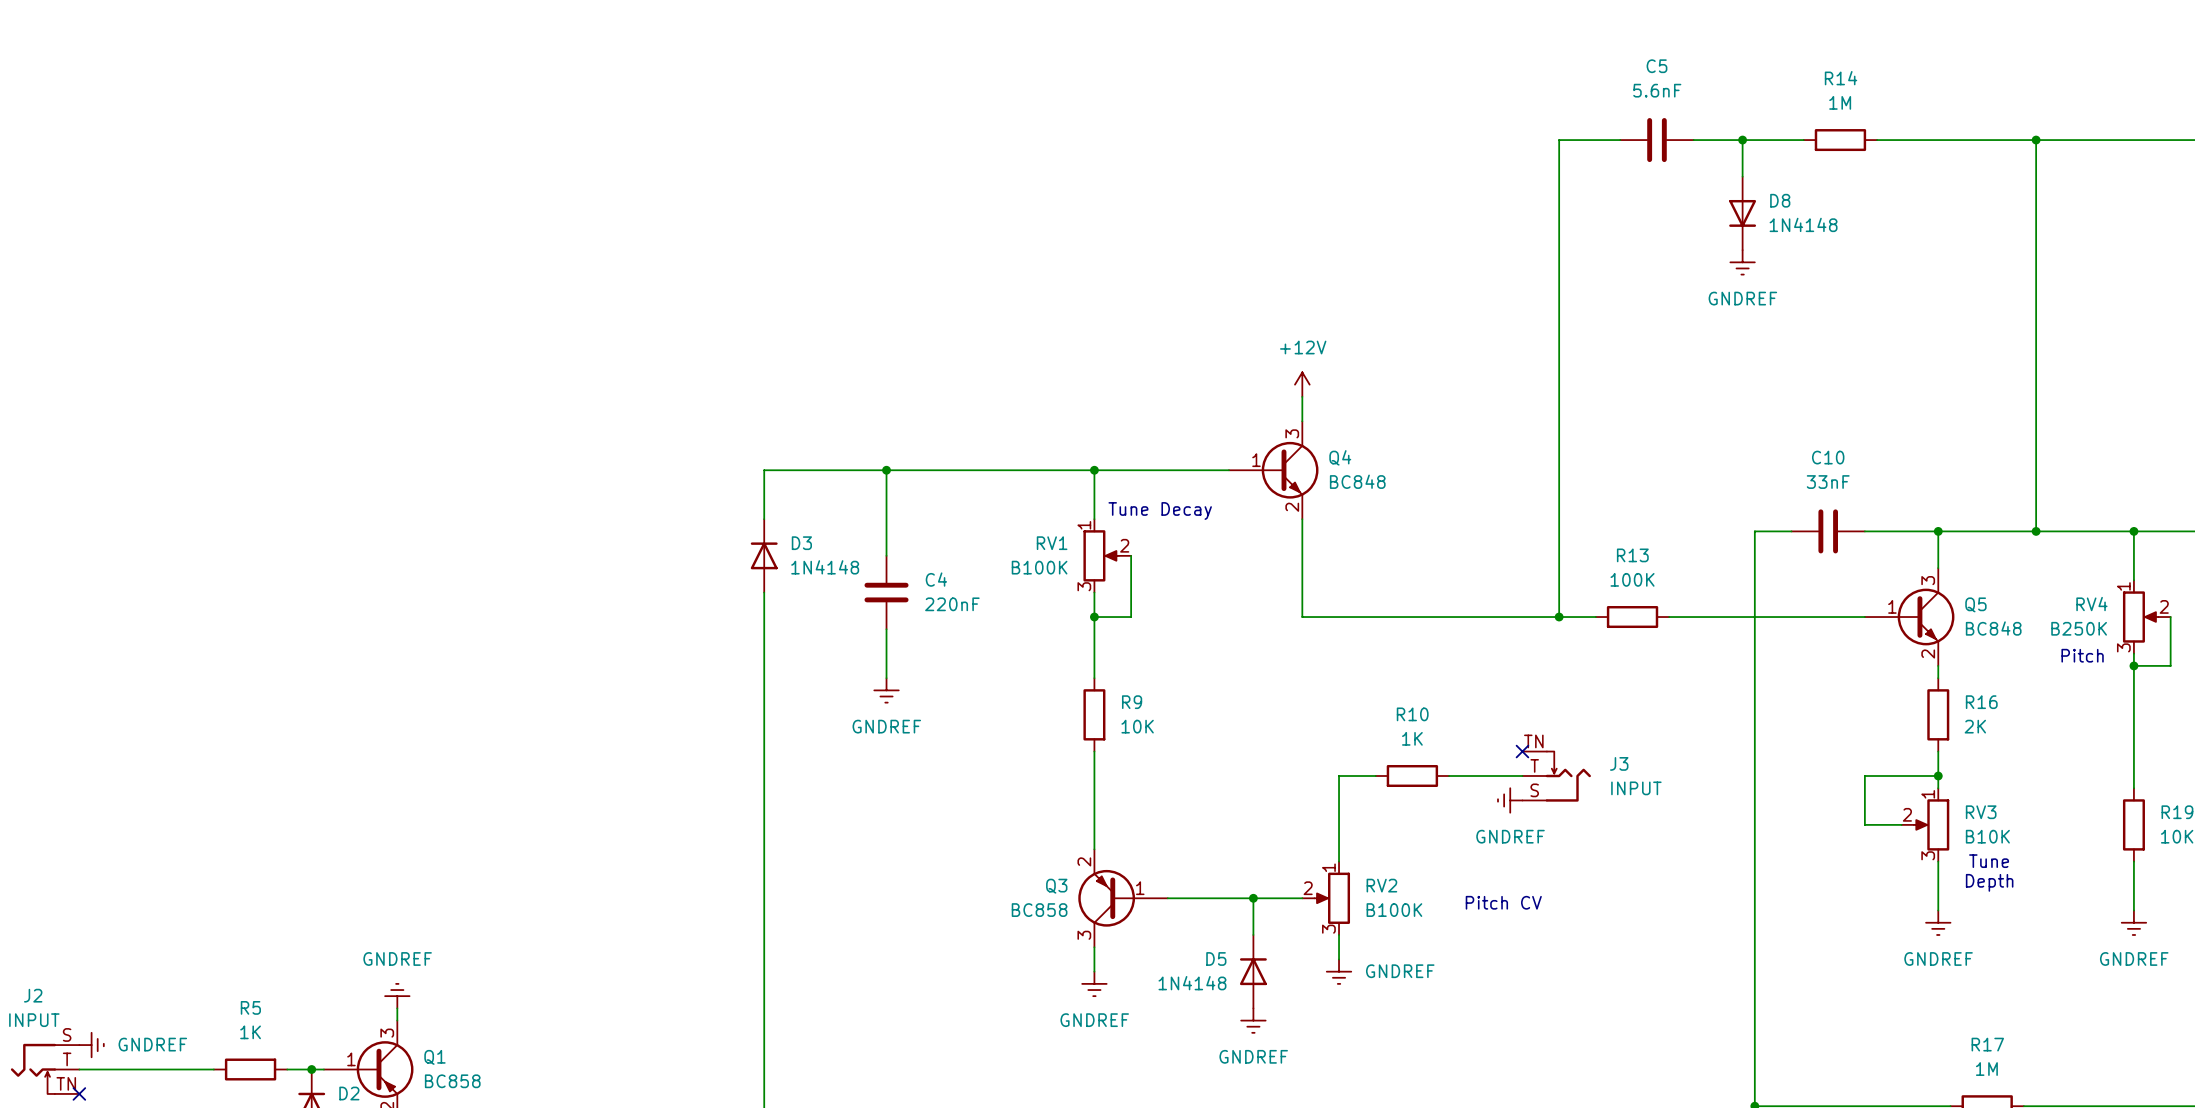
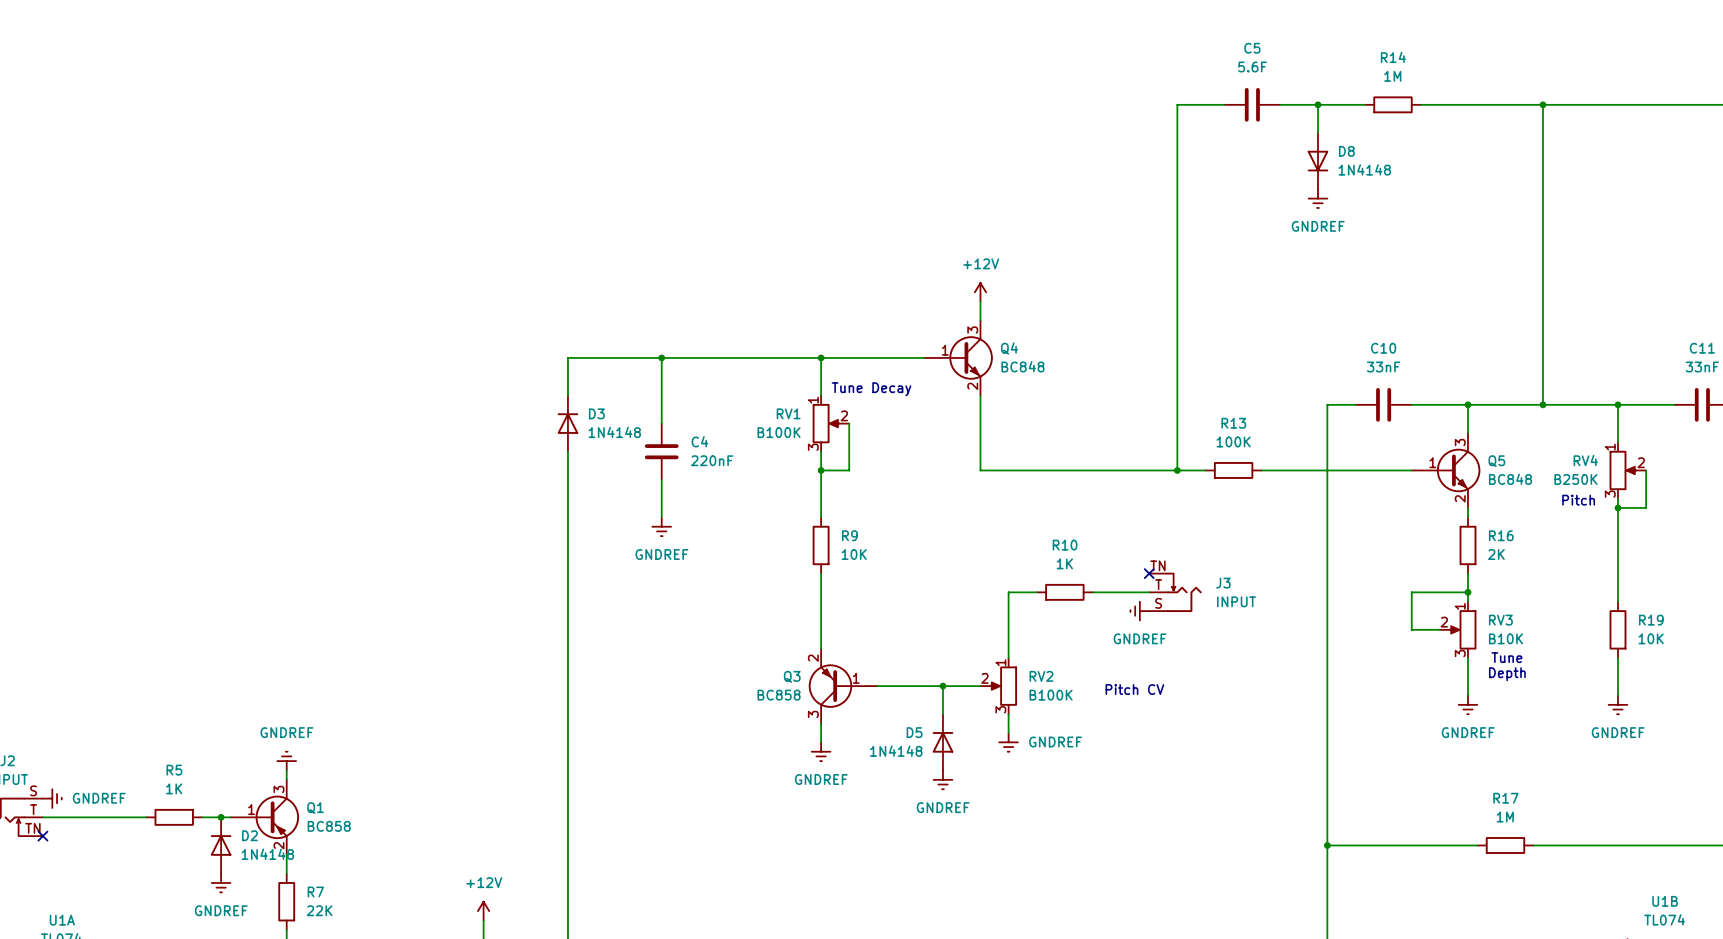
C5 value: 5.6nF (1657, 90) -> 5.6F (1252, 66)

